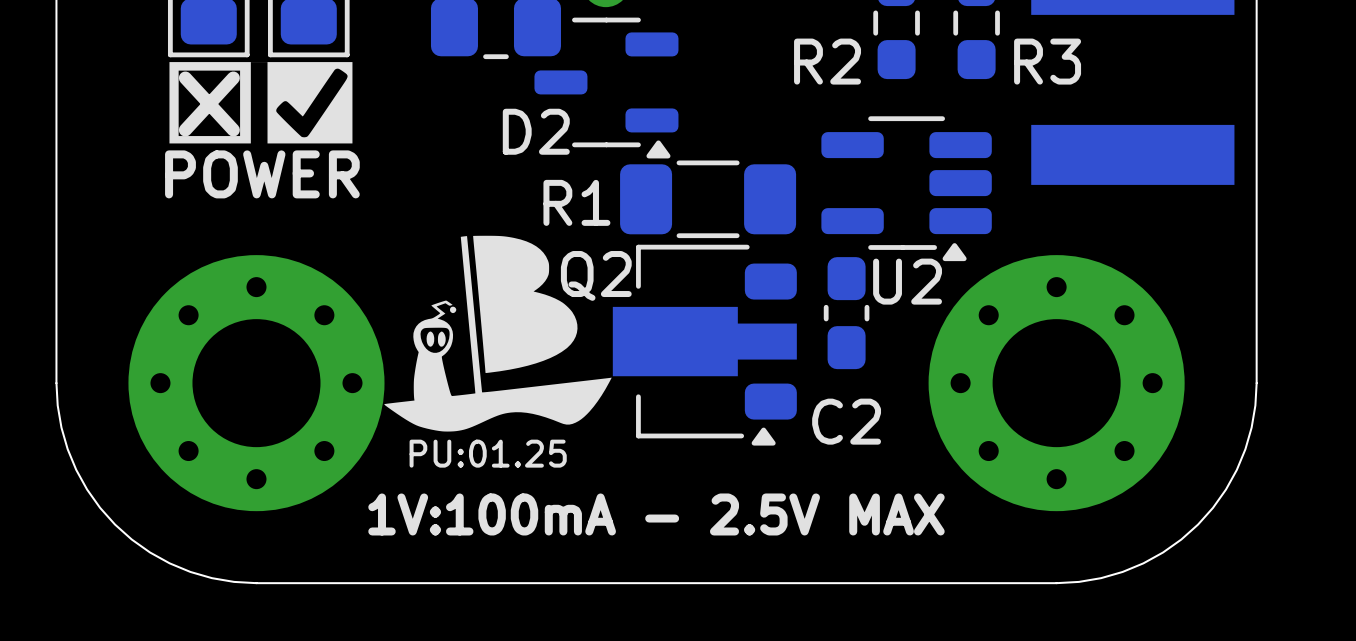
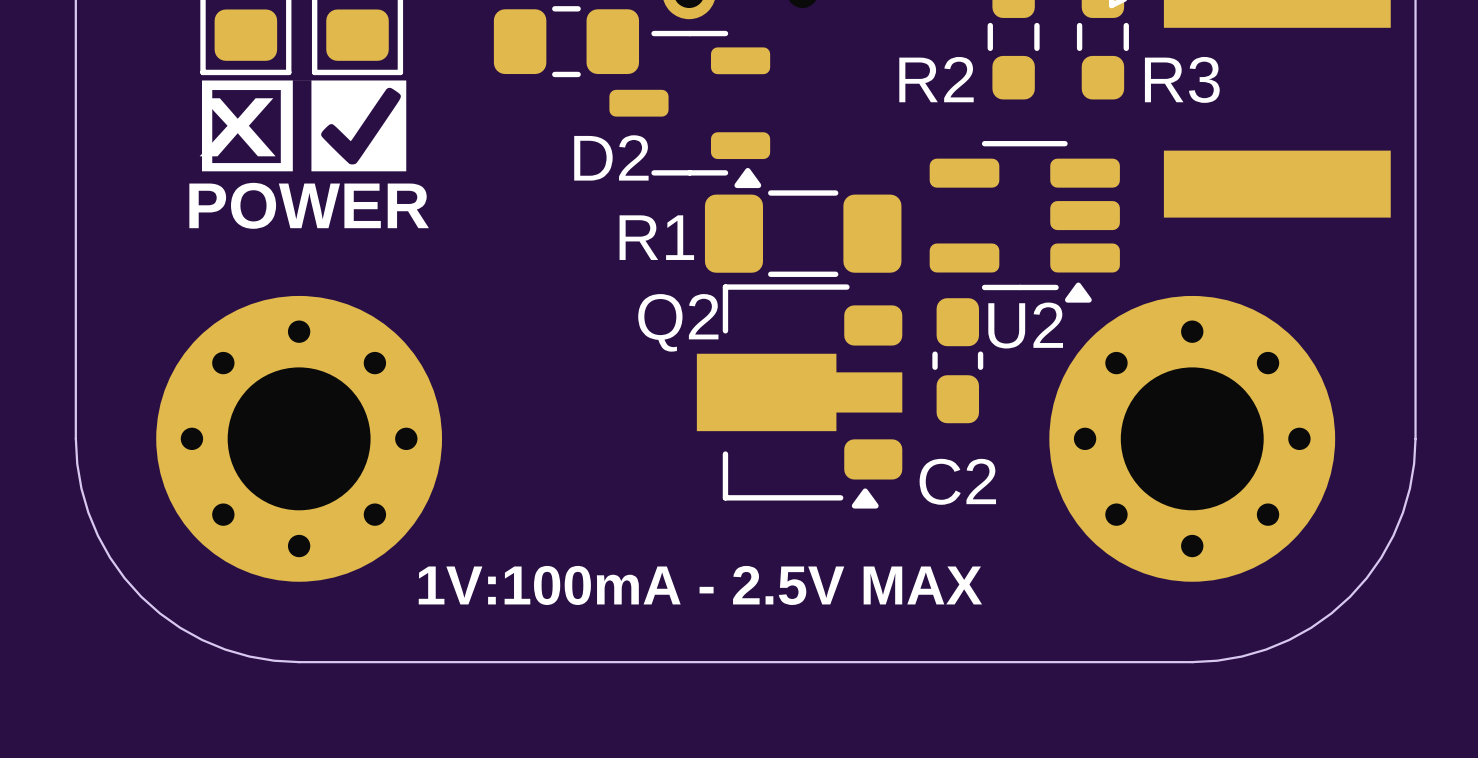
drawing: [384, 235, 612, 432] -> none
text: PU:01.25 (488, 453) -> none

